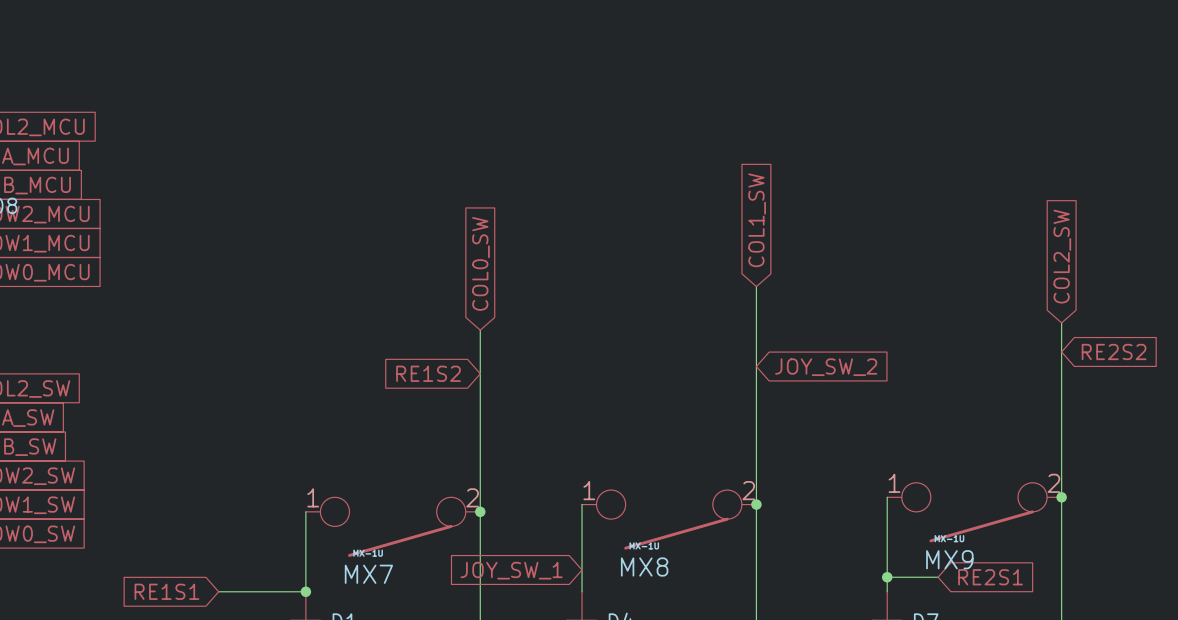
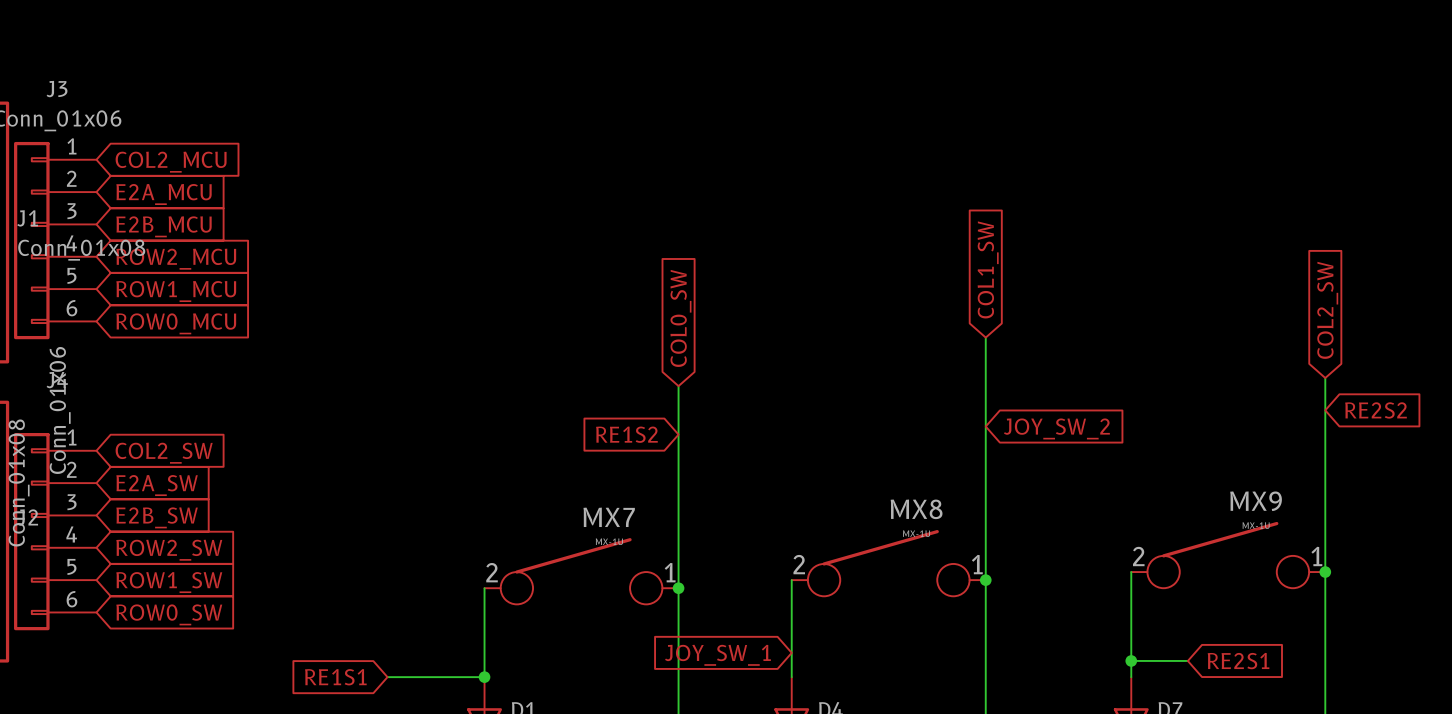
MX9 rotation: 0° (974, 512) -> 180° (1228, 555)
MX8 rotation: 0° (669, 519) -> 180° (888, 563)
MX7 rotation: 0° (393, 527) -> 180° (581, 571)

